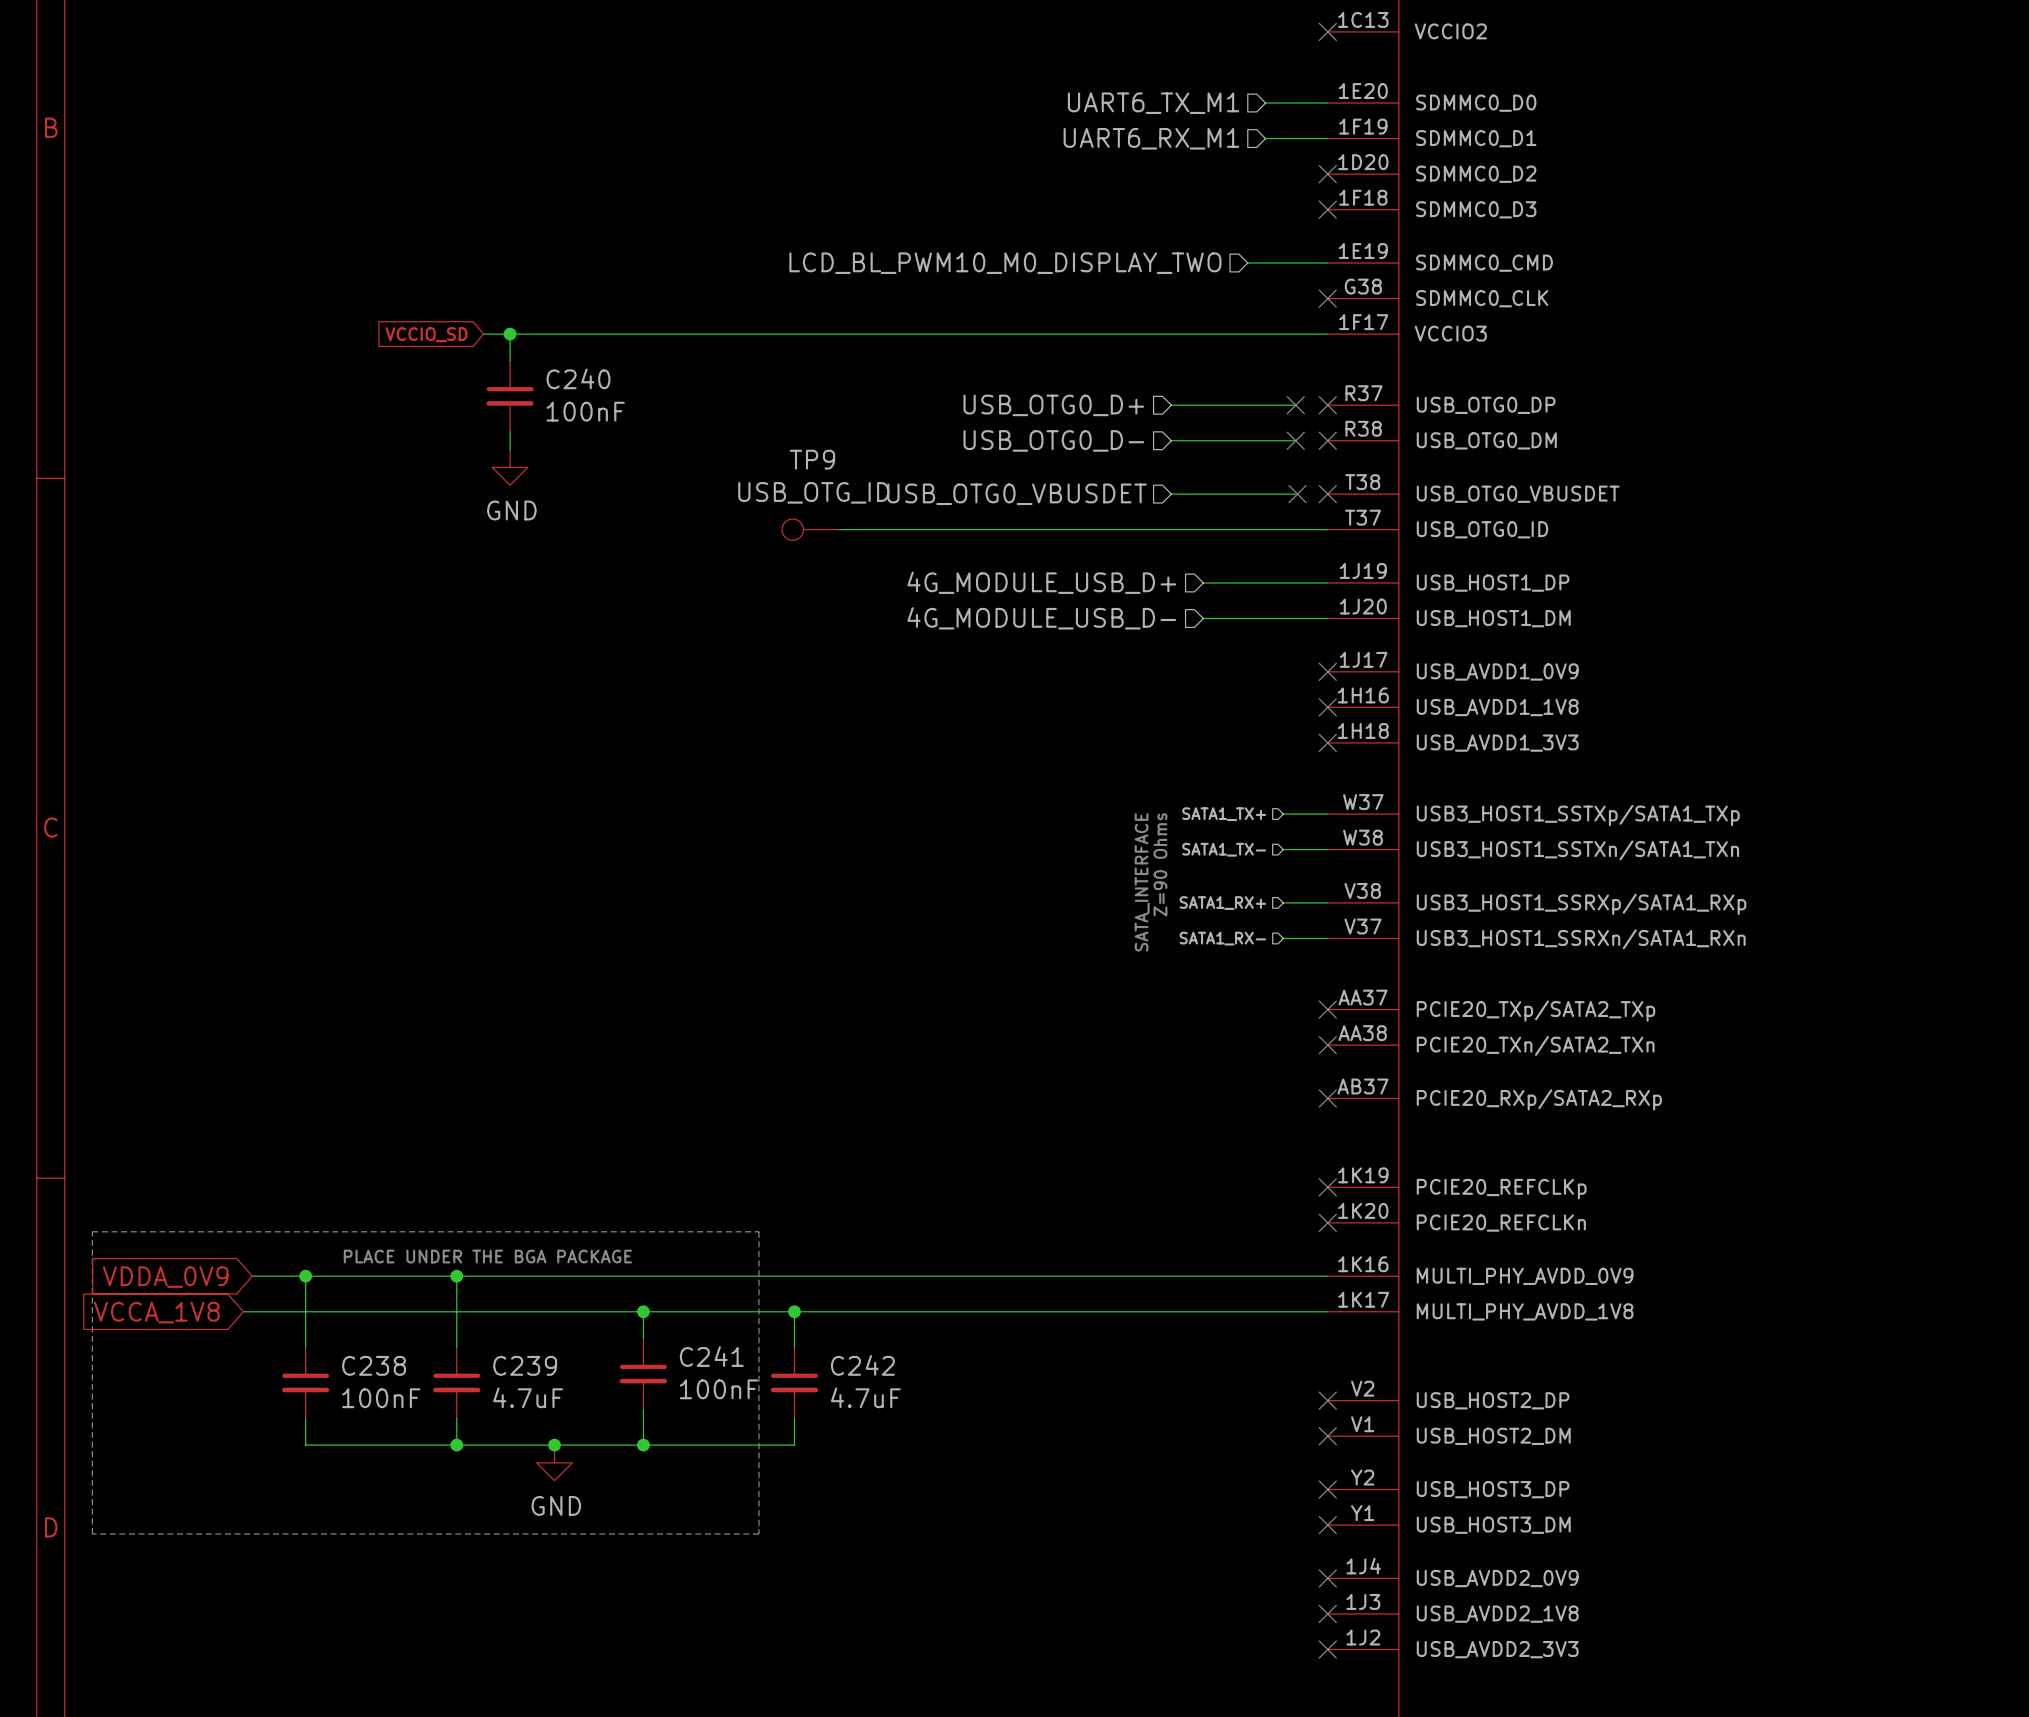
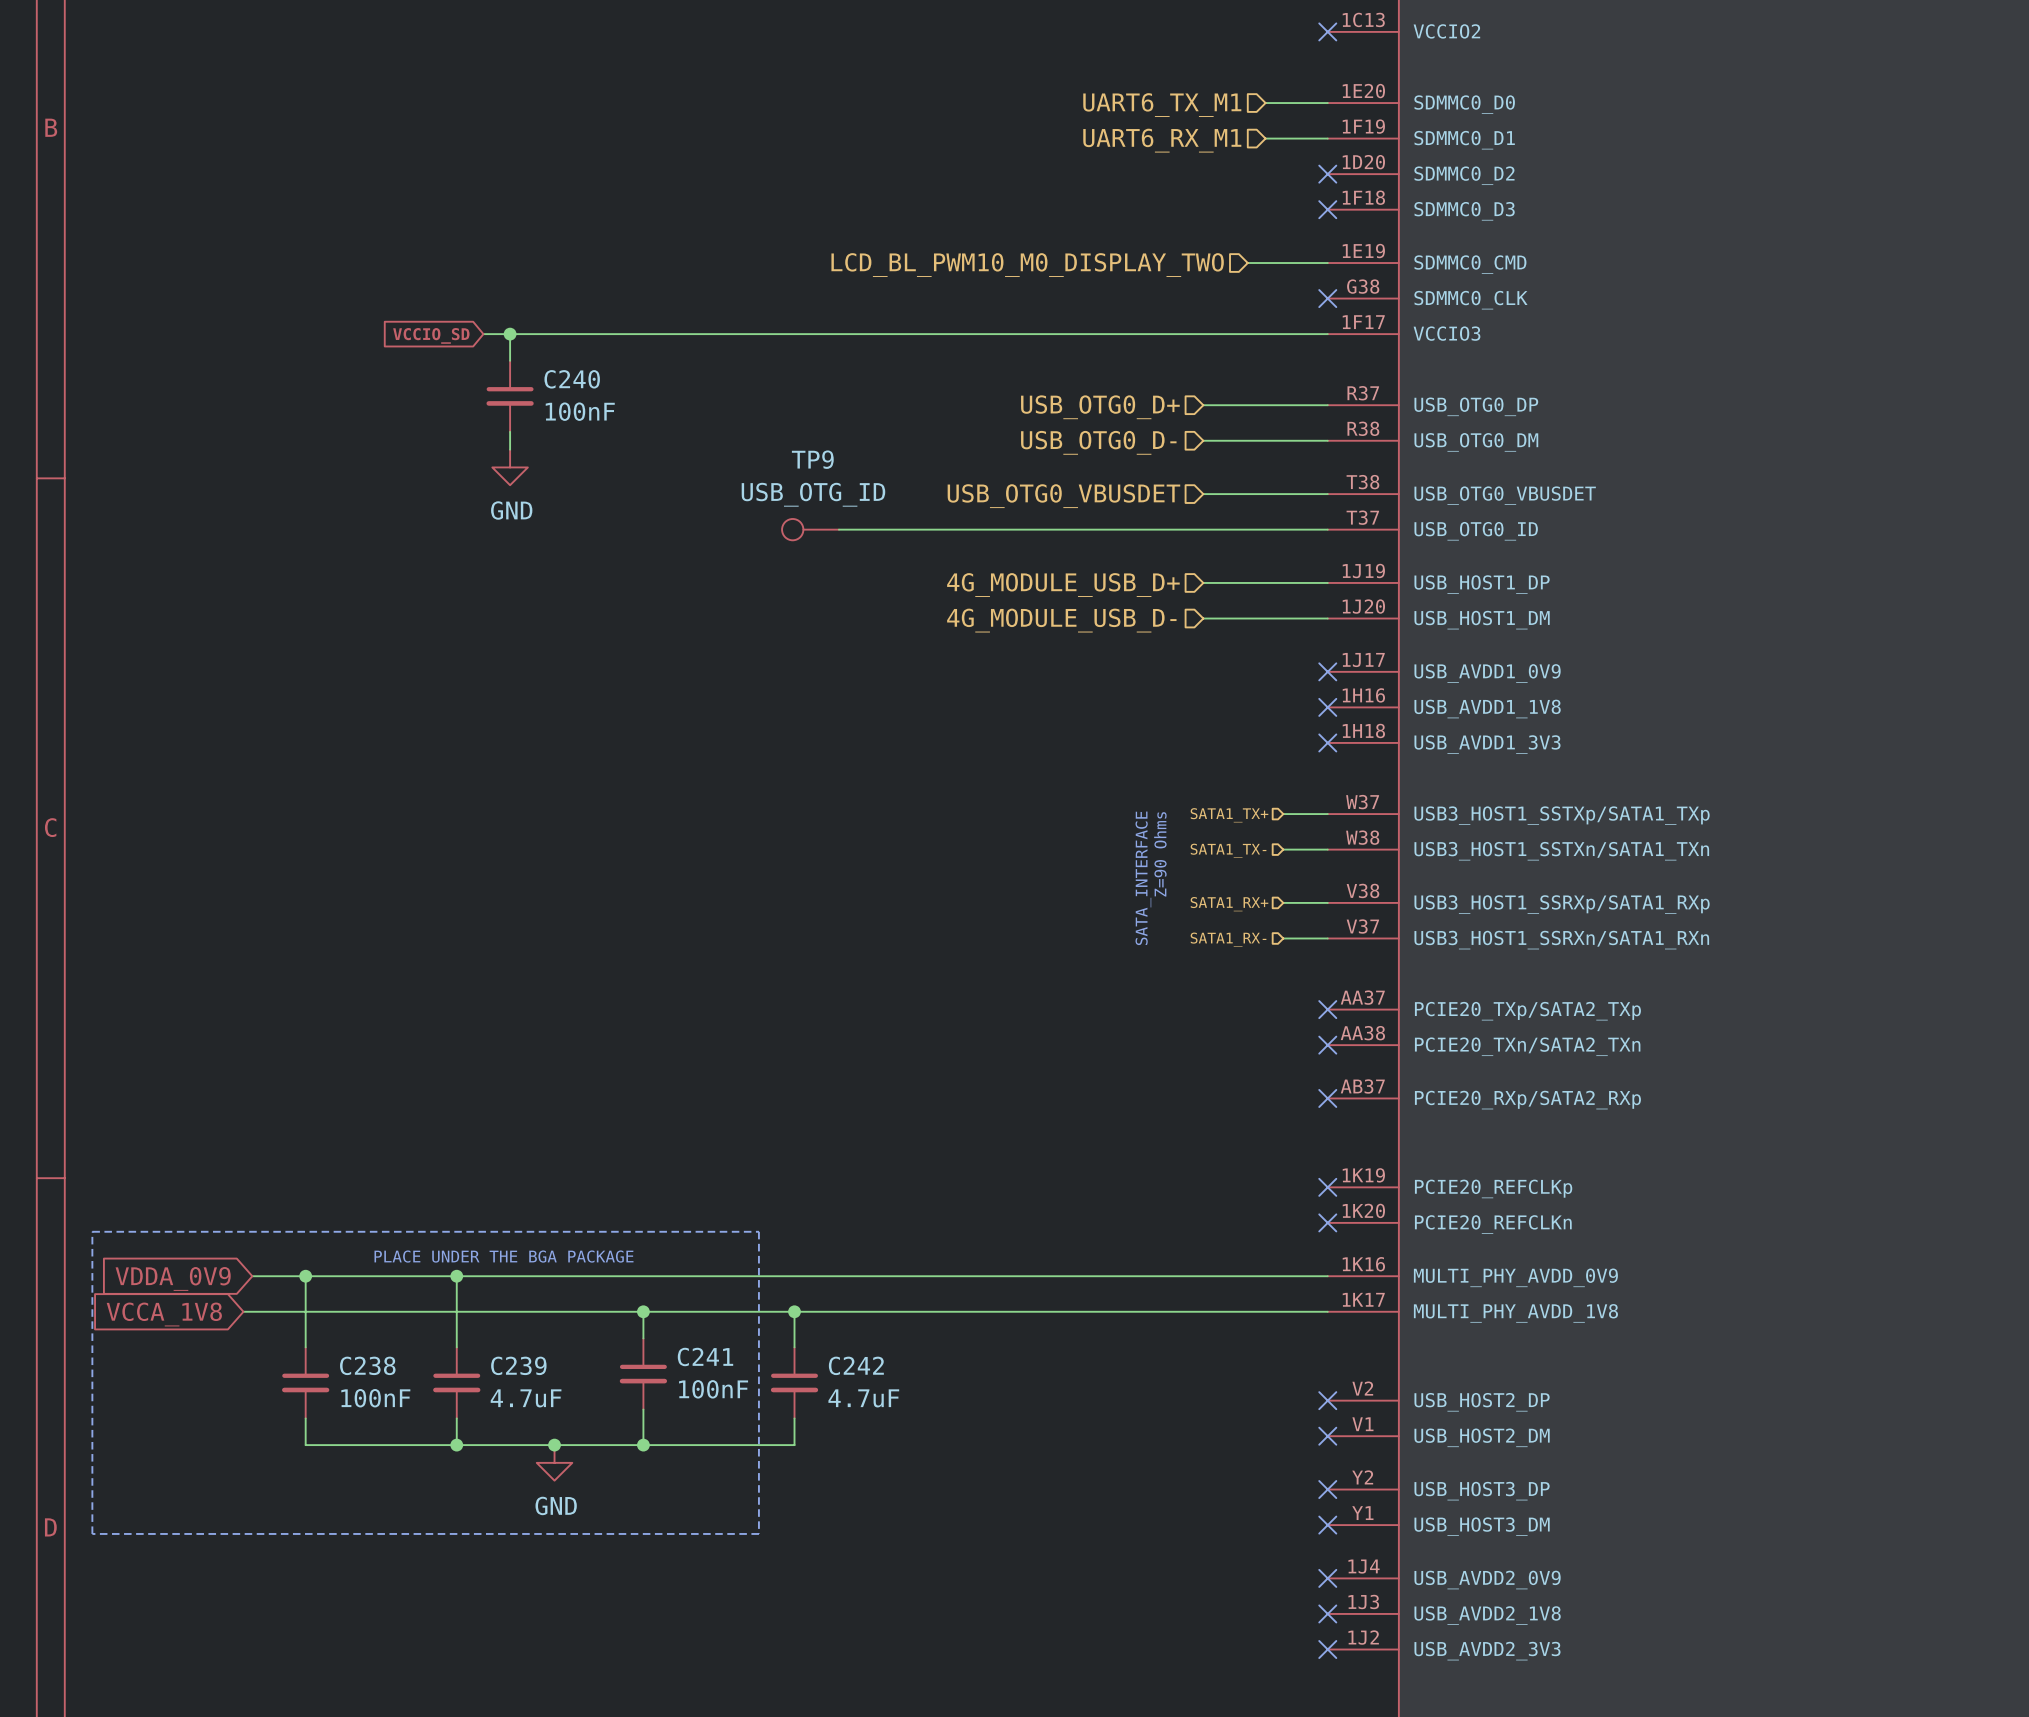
hierarchical label position: USB_OTG0_D+ (1053, 405) -> USB_OTG0_D+ (1100, 407)
wire: (1171, 405) (1203, 405) -> (1295, 405) (1327, 405)
no-connect mark: (1295, 405) -> none
no-connect mark: (1327, 405) -> none
hierarchical label position: USB_OTG0_D- (1053, 440) -> USB_OTG0_D- (1098, 442)
wire: (1171, 440) (1203, 440) -> (1295, 440) (1327, 440)
no-connect mark: (1295, 440) -> none
no-connect mark: (1327, 440) -> none
hierarchical label position: USB_OTG0_VBUSDET (1017, 494) -> USB_OTG0_VBUSDET (1063, 496)
wire: (1171, 494) (1203, 494) -> (1295, 494) (1327, 494)
no-connect mark: (1297, 494) -> none
no-connect mark: (1327, 494) -> none

